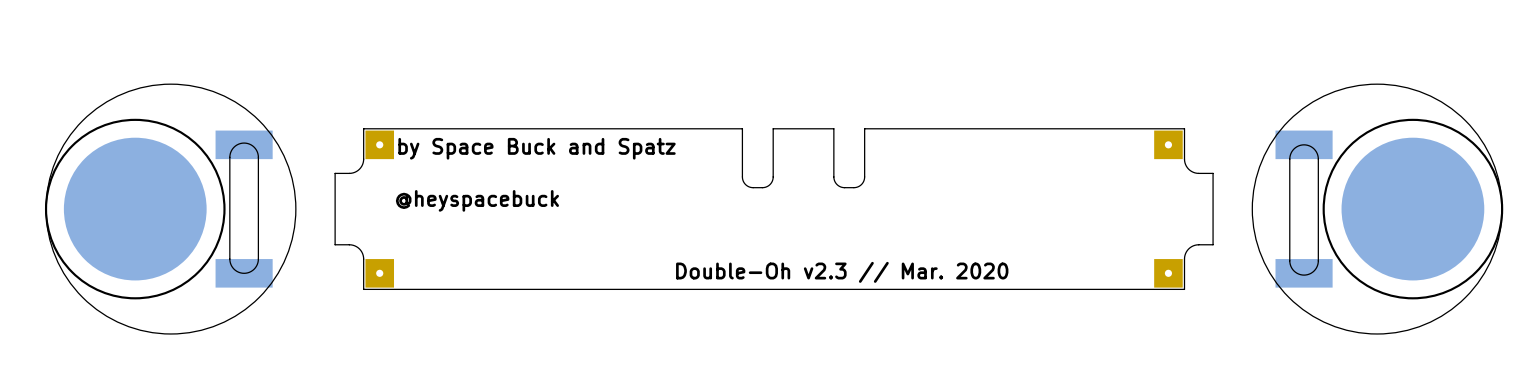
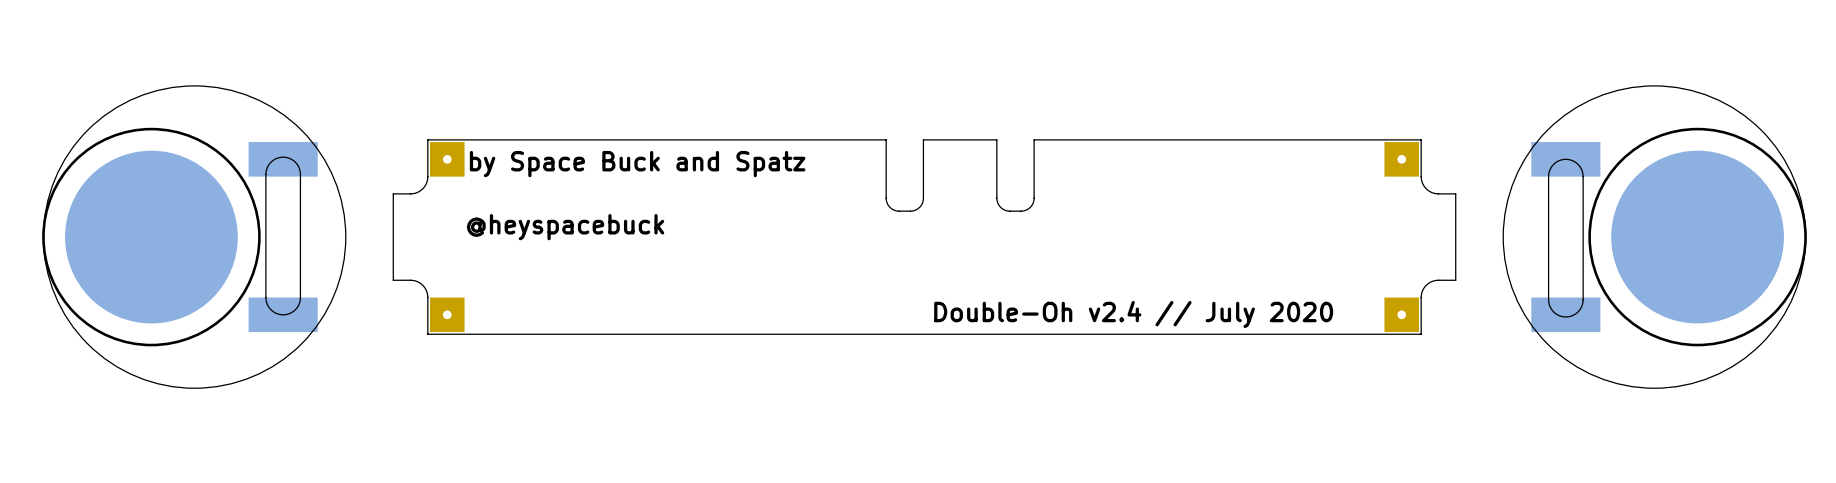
text: Double-Oh v2.3 // Mar. 2020 (842, 272) -> Double-Oh v2.4 // July 2020 (1133, 314)

